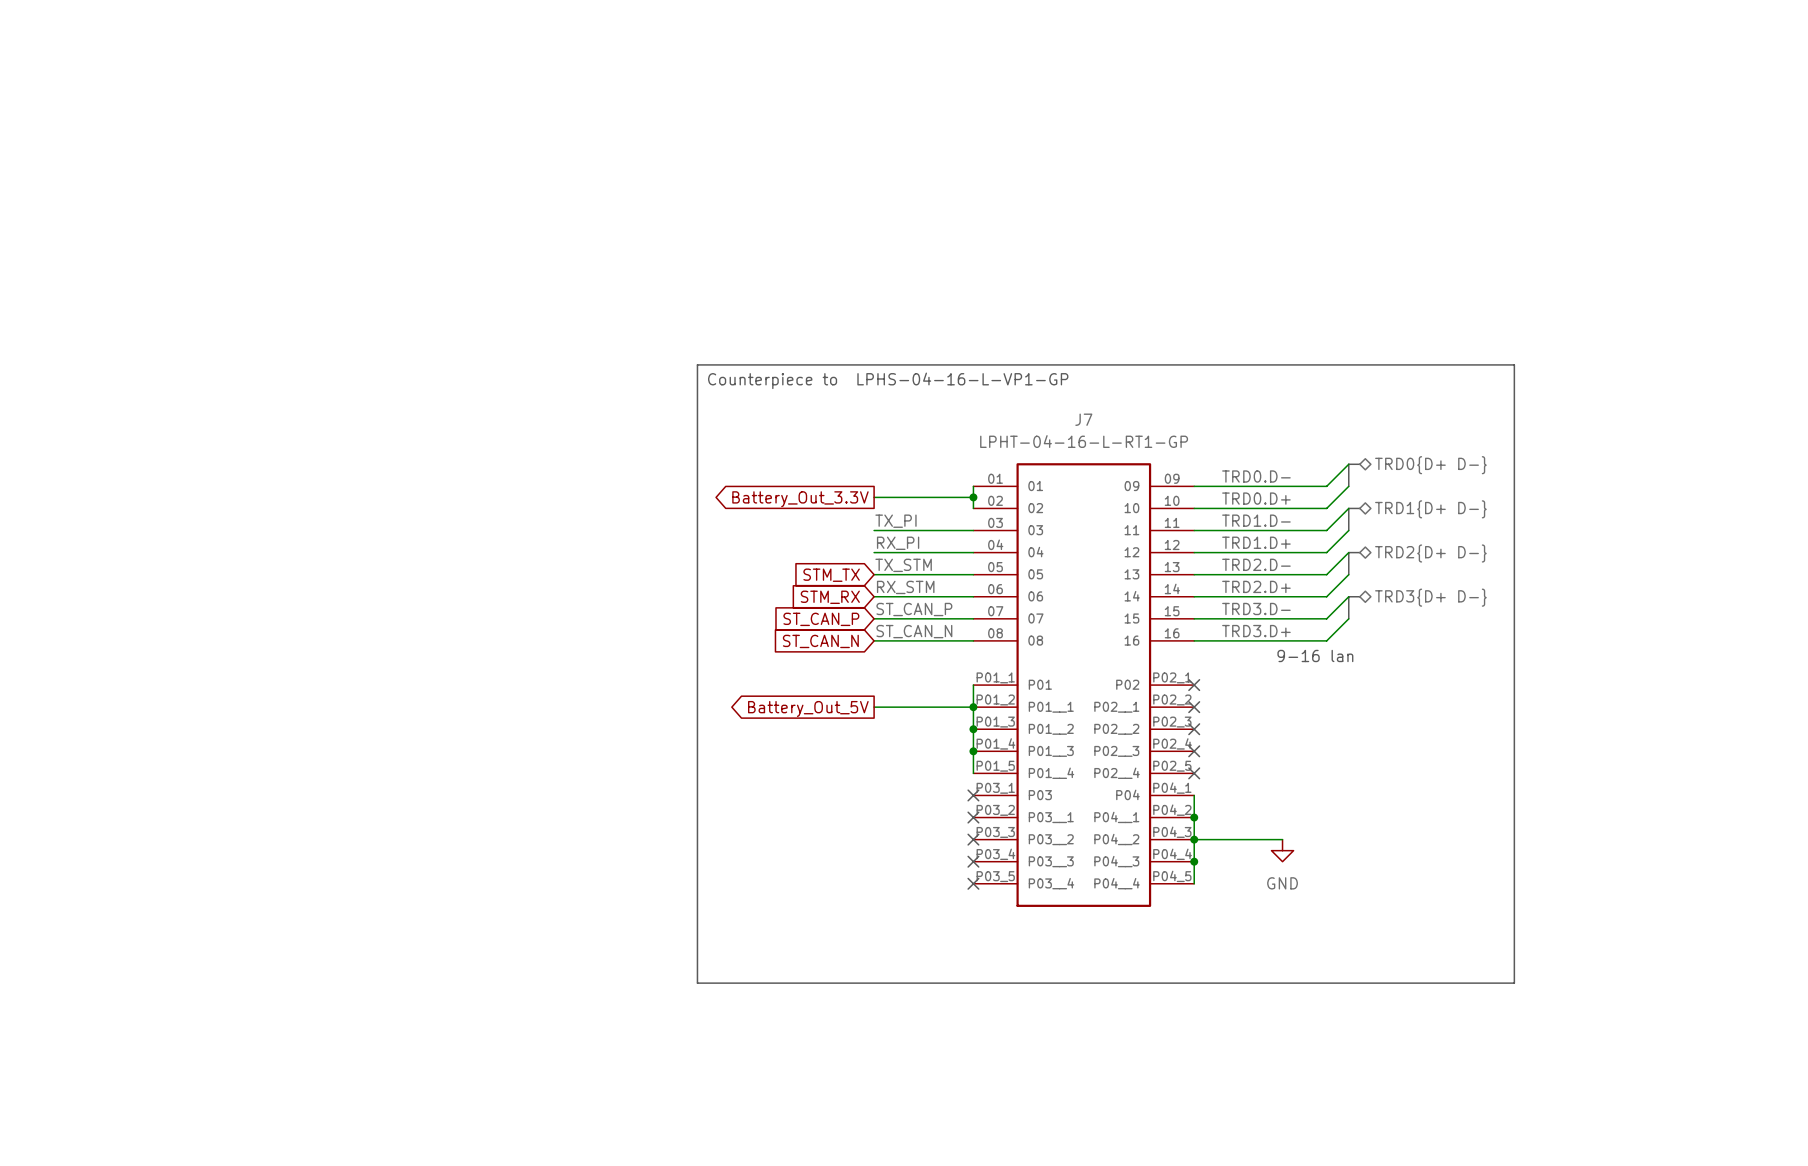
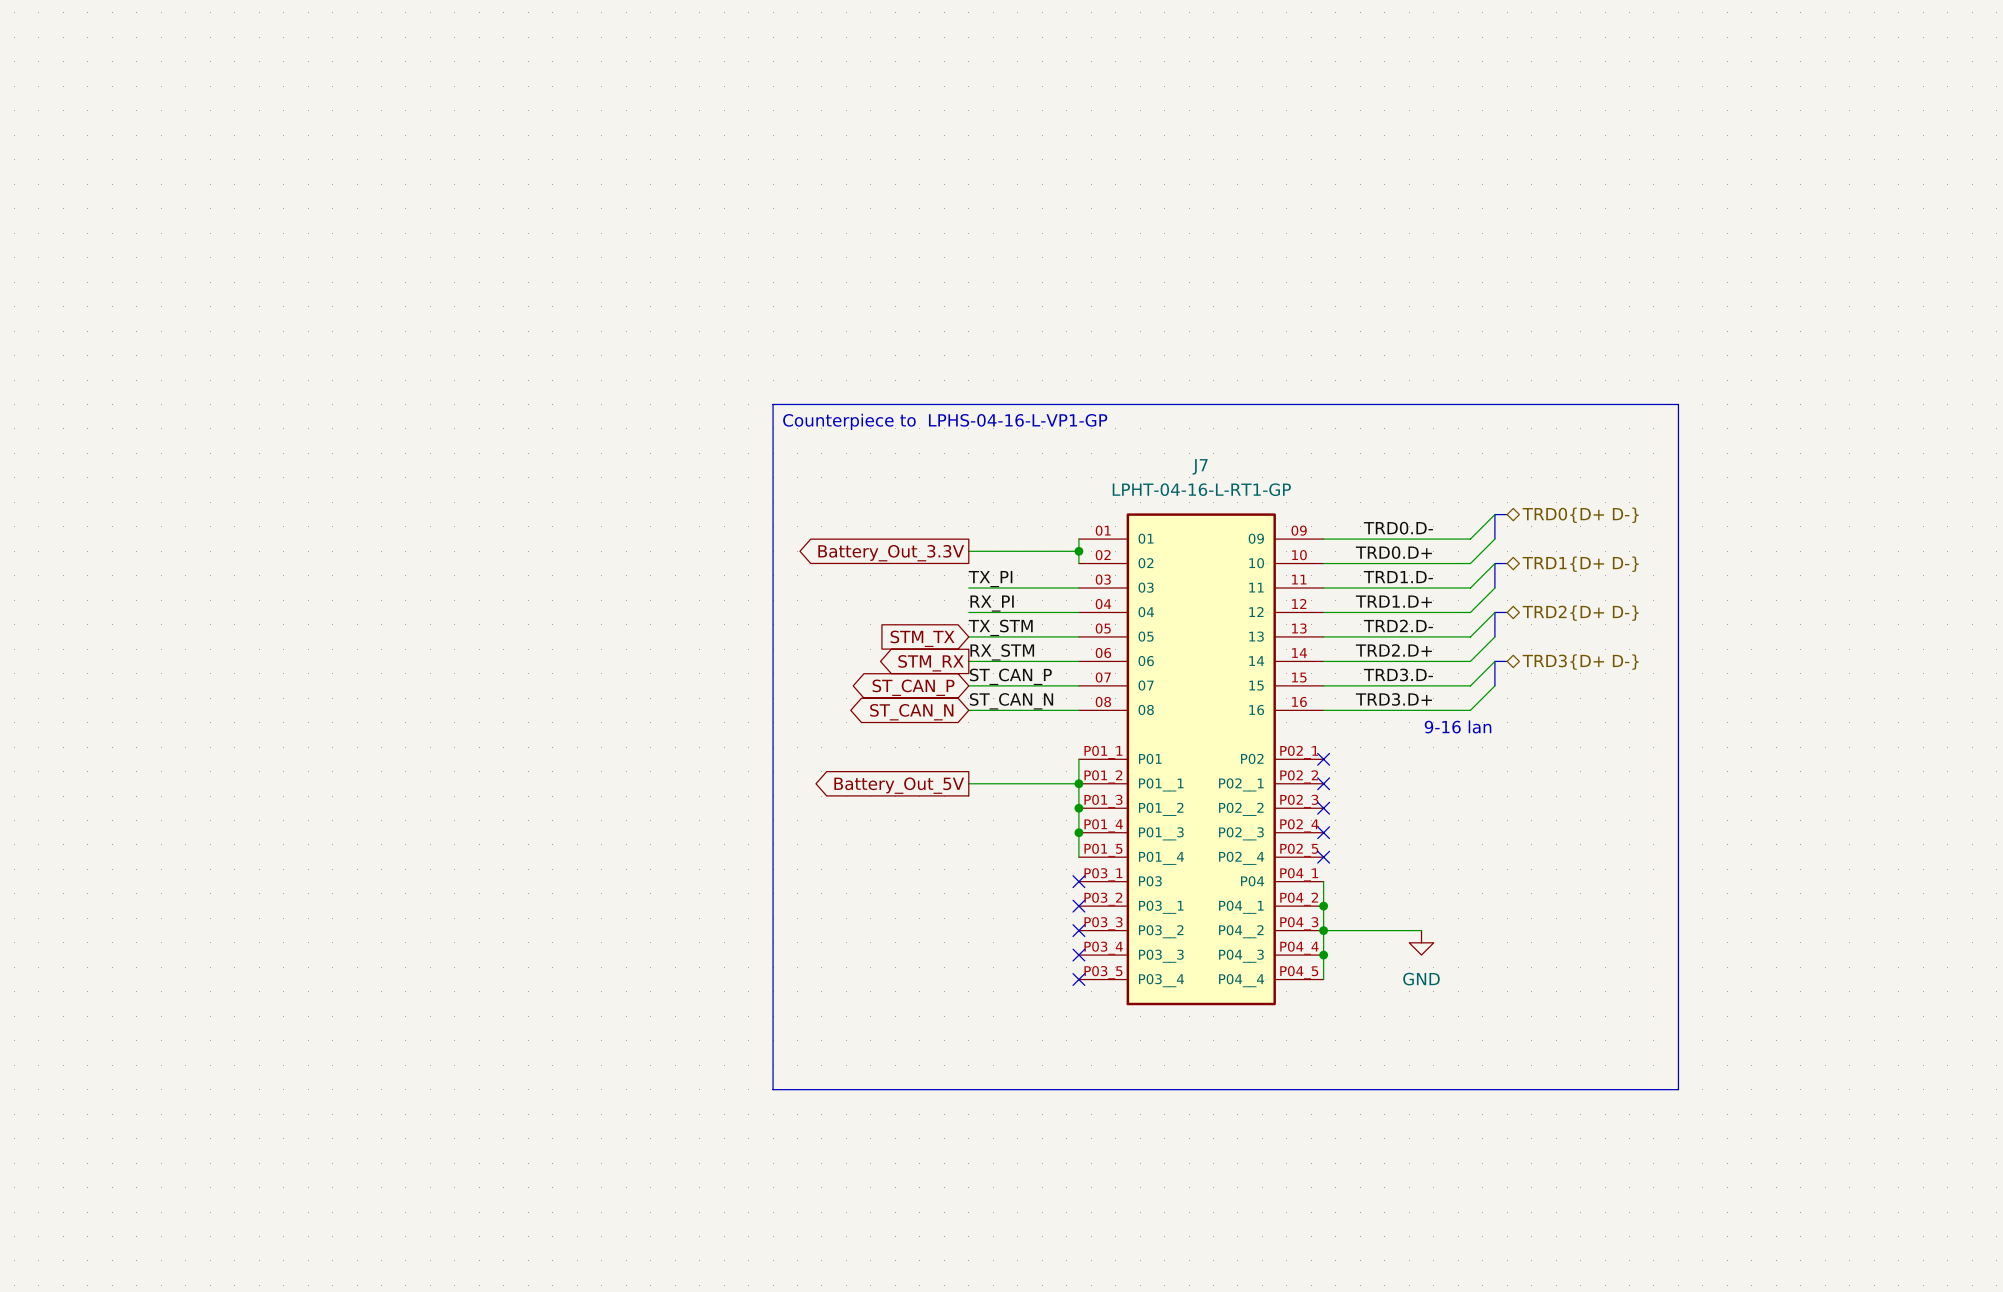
global label shape: input (830, 597) -> output (931, 663)
global label shape: input (821, 619) -> bidirectional (913, 687)
global label shape: input (820, 641) -> bidirectional (911, 712)

